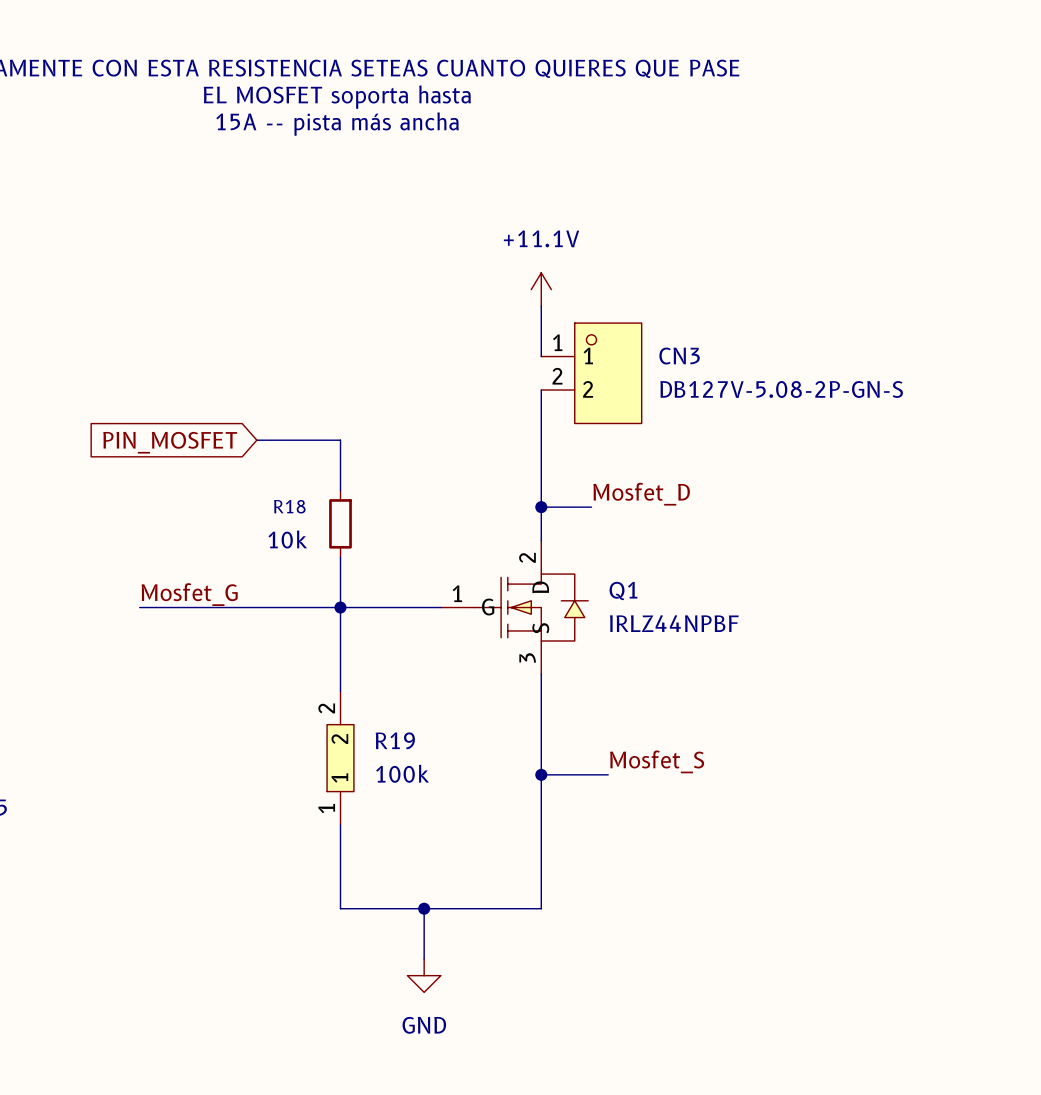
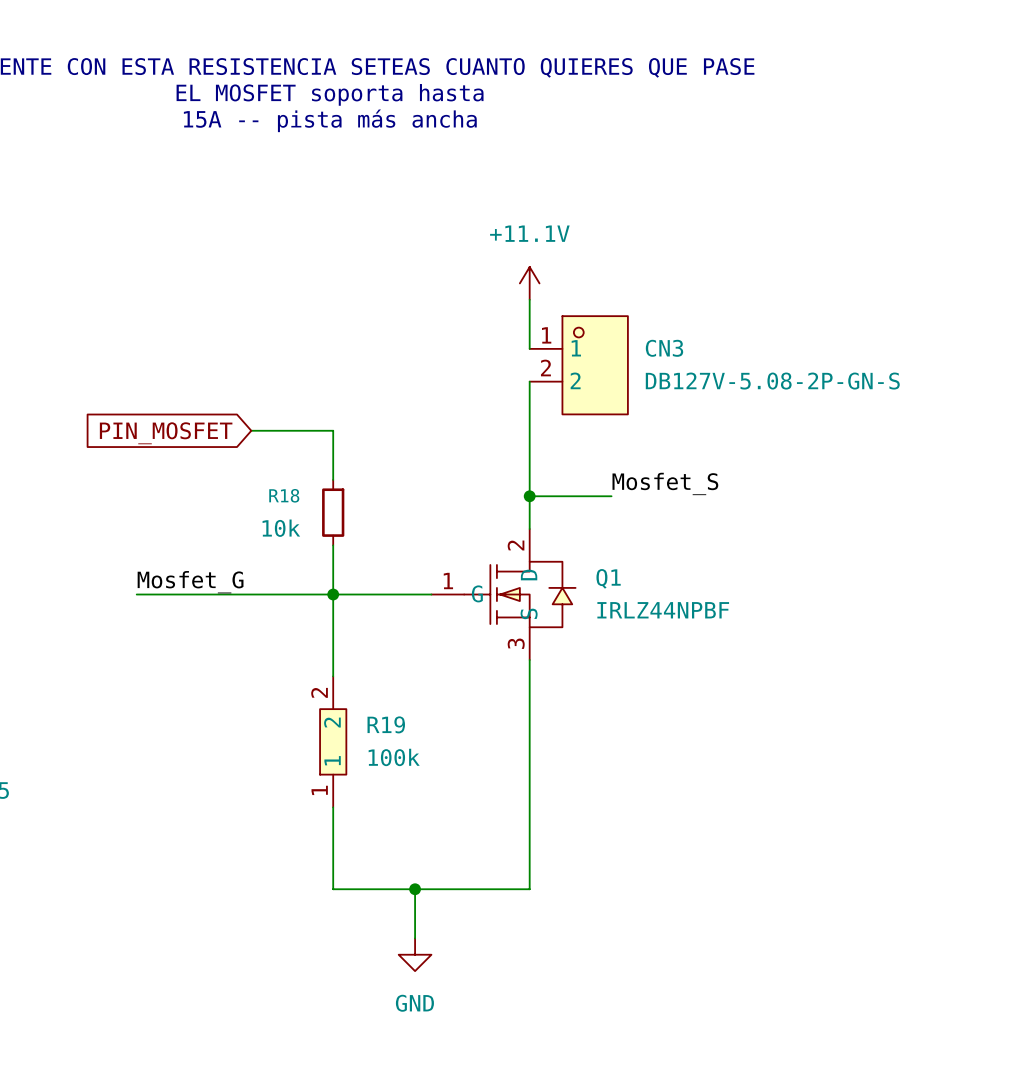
label: Mosfet_D (641, 494) -> none
wire: none -> (578, 496) (611, 496)
label position: Mosfet_S (657, 761) -> Mosfet_S (665, 483)
wire: (541, 774) (608, 774) -> none
junction: (541, 774) -> none

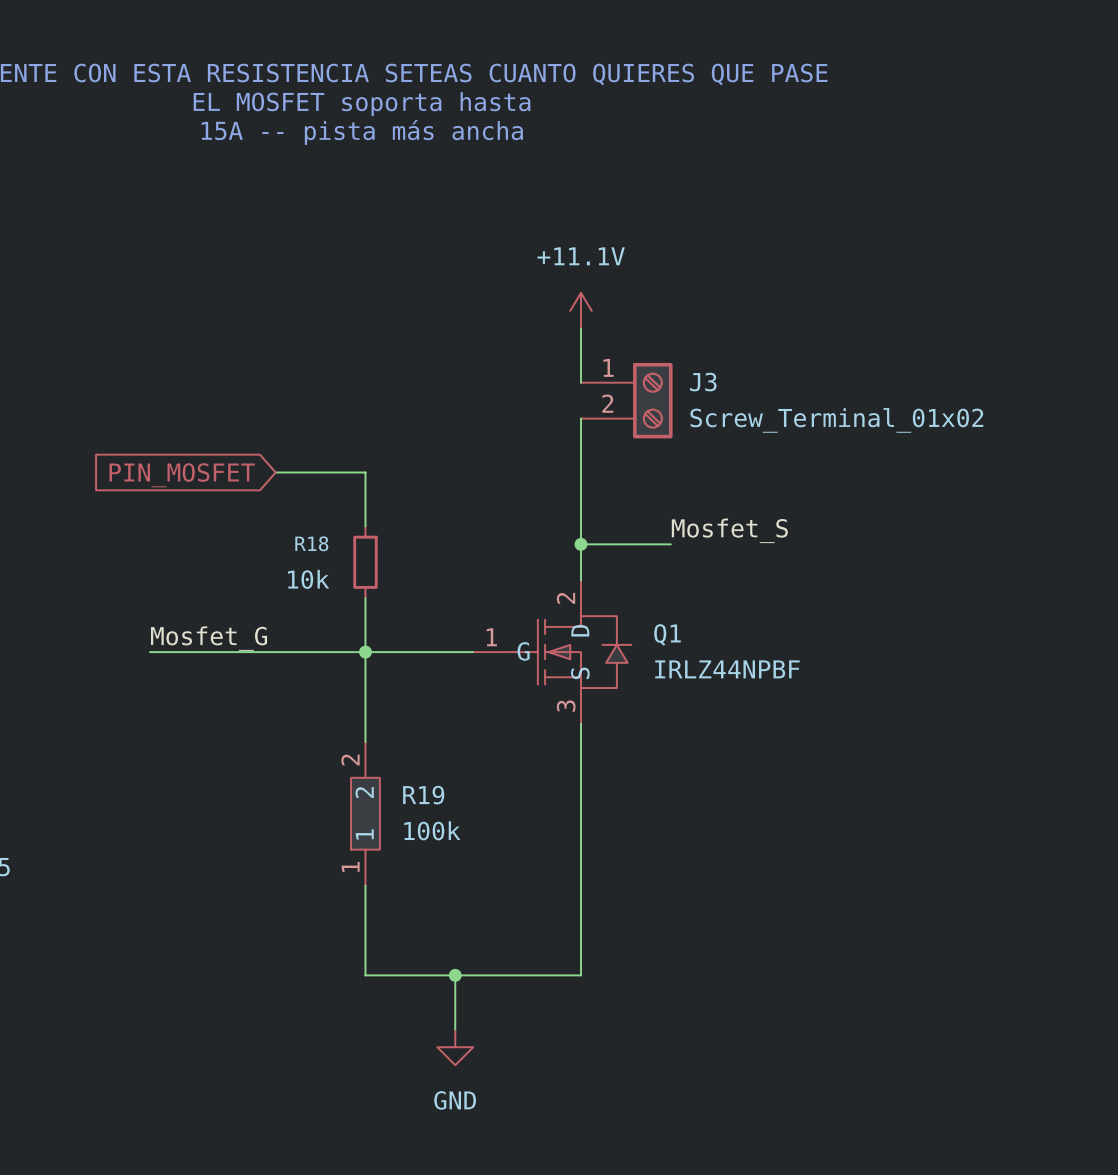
J3: none -> Screw_Terminal_01x02 (626, 400)
CN3: DB127V-5.08-2P-GN-S (578, 365) -> none

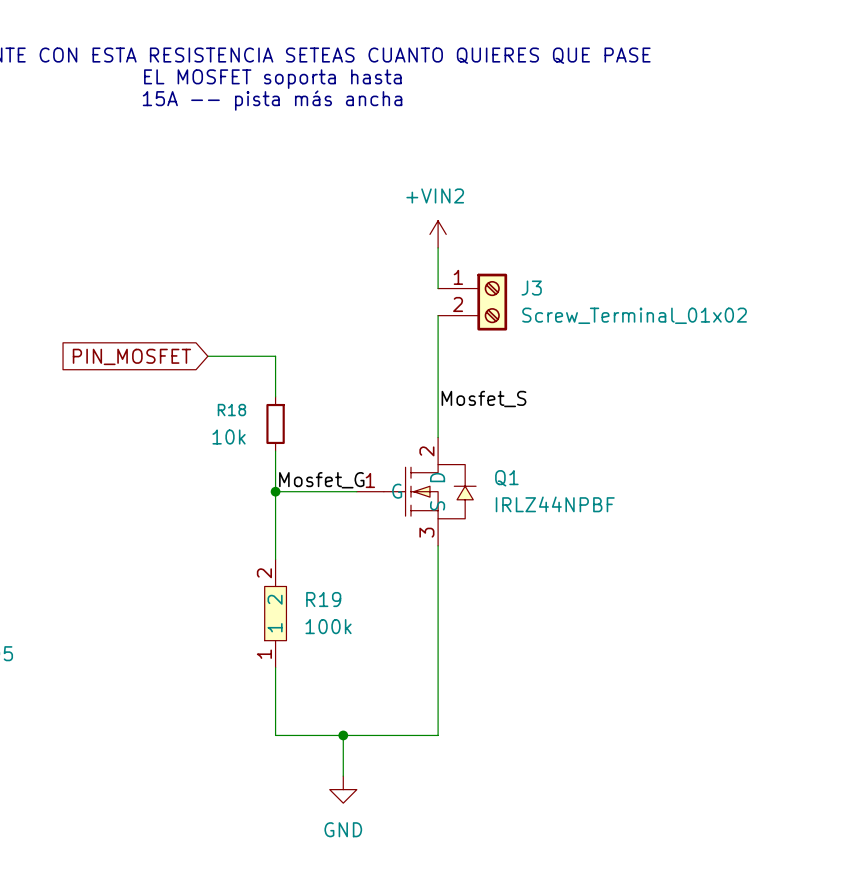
power symbol: +11.1V (580, 310) -> +VIN2 (438, 234)
label position: Mosfet_S (729, 530) -> Mosfet_S (483, 399)
wire: (580, 544) (670, 544) -> none
junction: (580, 544) -> none
label position: Mosfet_G (209, 638) -> Mosfet_G (321, 480)
wire: (149, 652) (365, 652) -> none

